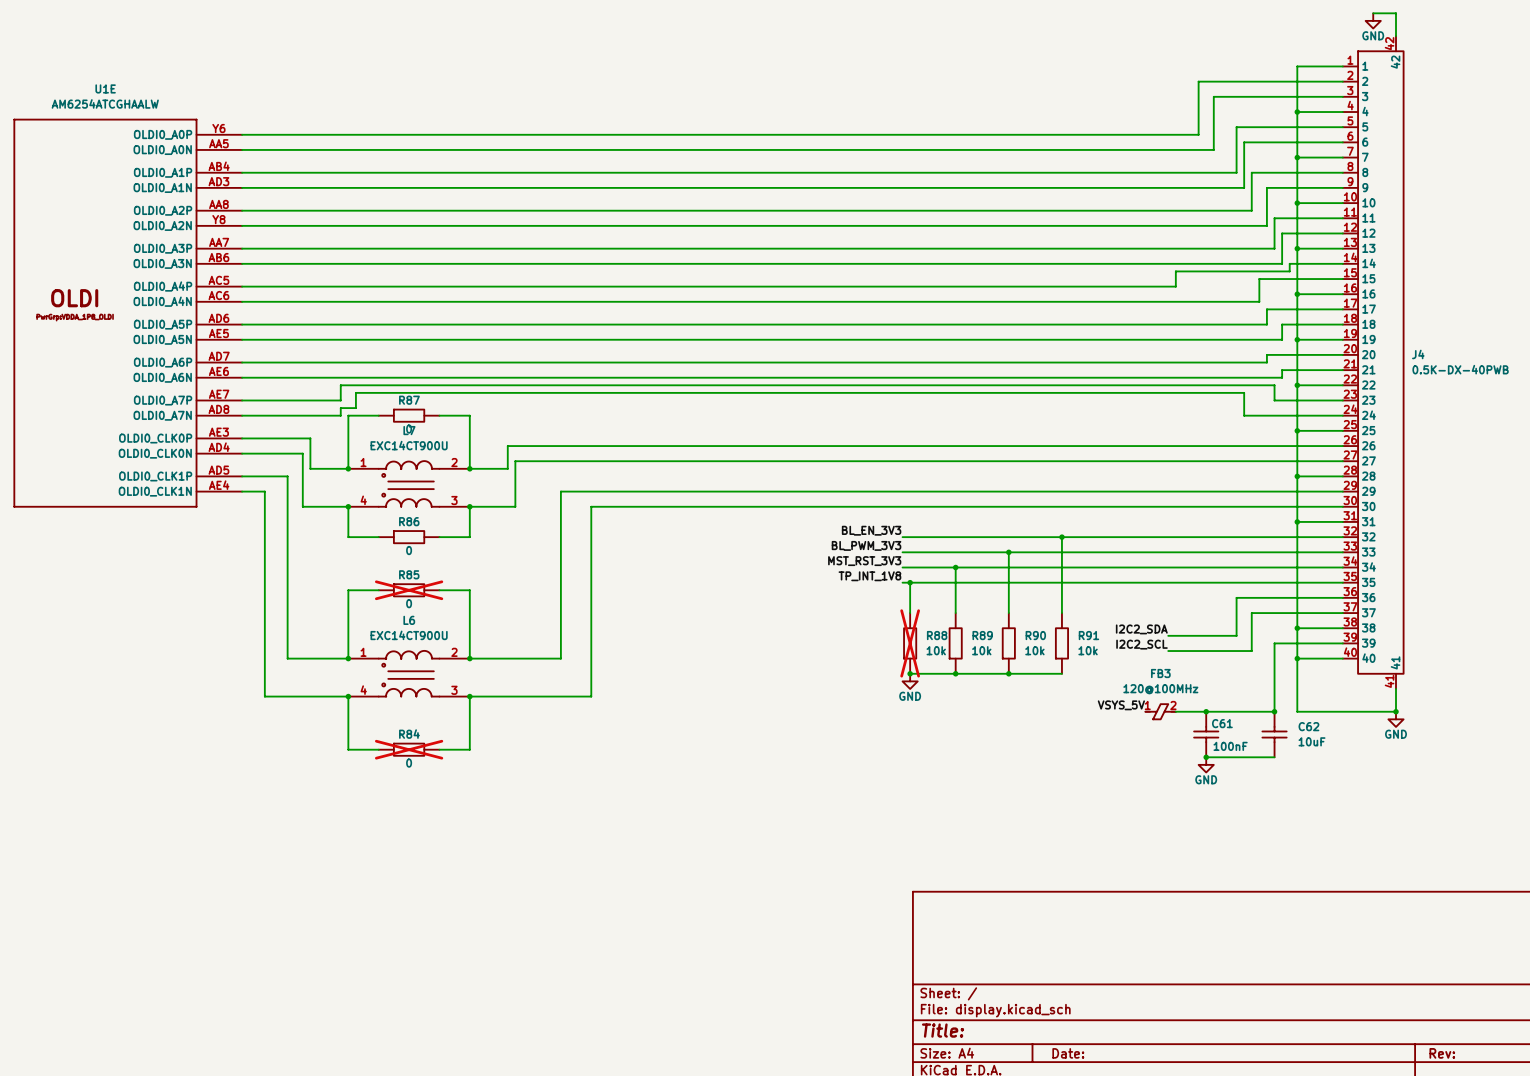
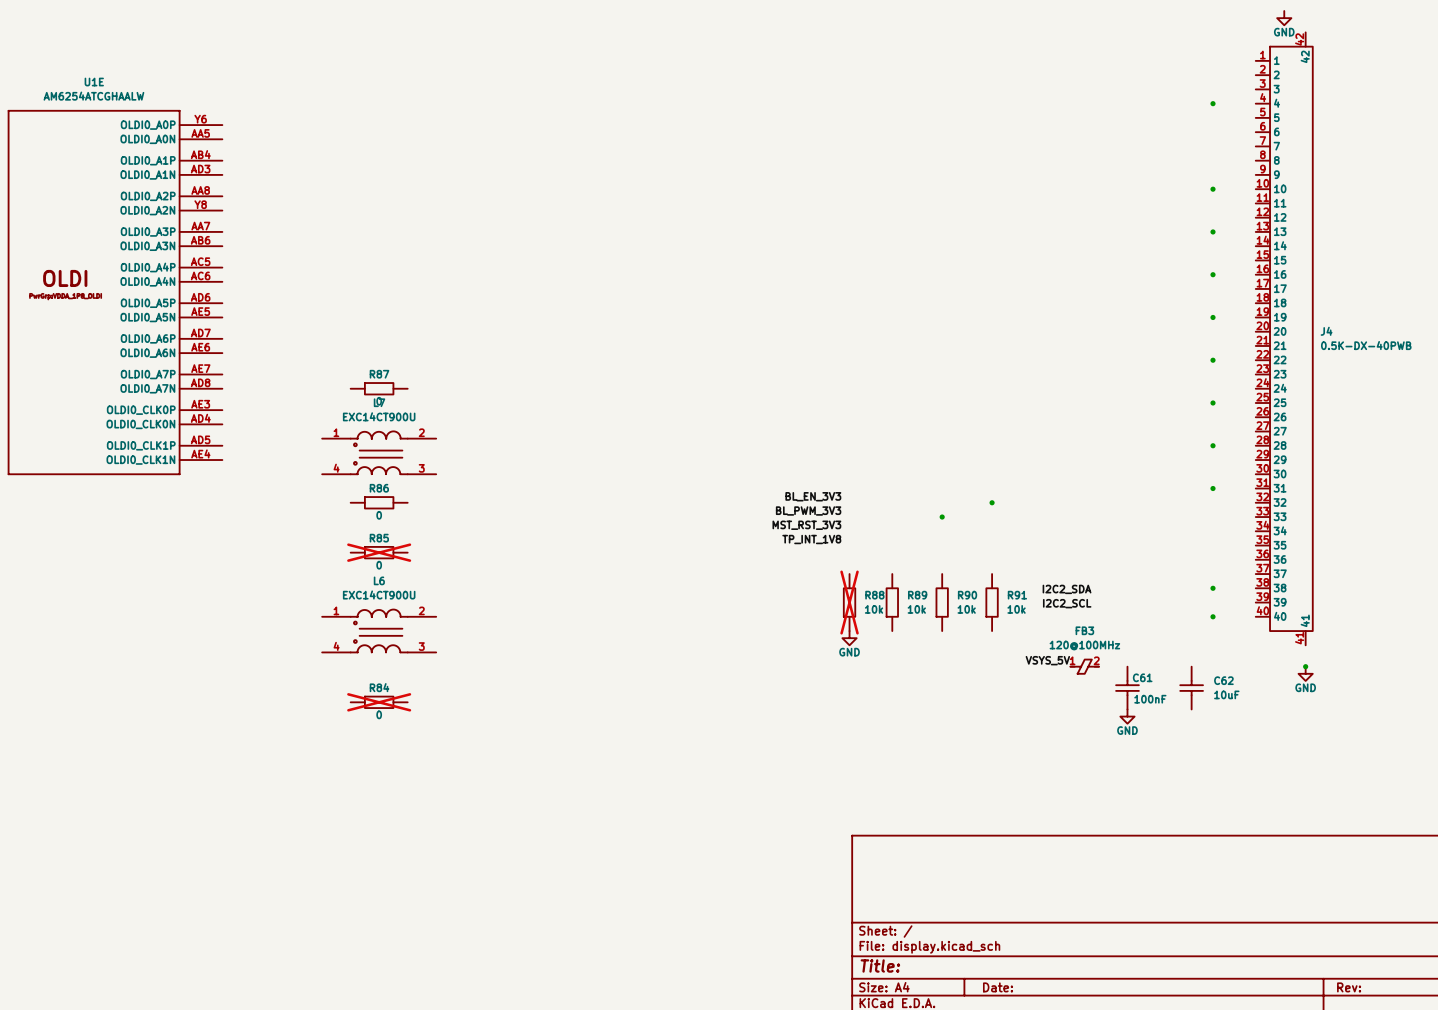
wire: (1373, 13) (1396, 13) (1396, 36) -> none
wire: (1342, 66) (1297, 66) (1297, 711) (1396, 711) (1396, 688) -> none
wire: (1342, 81) (1198, 81) (1198, 134) (242, 134) -> none
wire: (1342, 96) (1213, 96) (1213, 149) (242, 149) -> none
wire: (1297, 112) (1342, 112) -> none
wire: (1342, 127) (1236, 127) (1236, 172) (242, 172) -> none
wire: (1342, 142) (1244, 142) (1244, 187) (242, 187) -> none
wire: (1297, 157) (1342, 157) -> none
junction: (1297, 157) -> none
wire: (1342, 172) (1251, 172) (1251, 210) (242, 210) -> none
wire: (1342, 187) (1266, 187) (1266, 225) (242, 225) -> none
wire: (1297, 203) (1342, 203) -> none
wire: (1342, 218) (1274, 218) (1274, 248) (242, 248) -> none
wire: (1342, 233) (1282, 233) (1282, 263) (242, 263) -> none
wire: (1297, 248) (1342, 248) -> none
wire: (1342, 263) (1289, 263) (1289, 271) (1175, 271) (1175, 286) (242, 286) -> none
wire: (1342, 279) (1259, 279) (1259, 301) (242, 301) -> none
wire: (1297, 294) (1342, 294) -> none
wire: (1342, 309) (1266, 309) (1266, 324) (242, 324) -> none
wire: (1342, 324) (1282, 324) (1282, 339) (242, 339) -> none
wire: (1297, 339) (1342, 339) -> none
wire: (1342, 354) (1266, 354) (1266, 362) (242, 362) -> none
wire: (1342, 370) (1282, 370) (1282, 377) (242, 377) -> none
wire: (1297, 385) (1342, 385) -> none
wire: (242, 400) (340, 400) (340, 385) (1274, 385) (1274, 400) (1342, 400) -> none
wire: (242, 415) (340, 415) (340, 408) (355, 408) (355, 392) (1244, 392) (1244, 415) (1342, 415) -> none
wire: (378, 415) (348, 415) (348, 468) (310, 468) (310, 438) (242, 438) -> none
wire: (439, 415) (469, 415) (469, 468) (507, 468) (507, 446) (1342, 446) -> none
wire: (1297, 430) (1342, 430) -> none
wire: (242, 453) (302, 453) (302, 506) (348, 506) (348, 537) (378, 537) -> none
wire: (1342, 461) (515, 461) (515, 506) (469, 506) (469, 537) (439, 537) -> none
junction: (348, 468) -> none
junction: (469, 468) -> none
wire: (242, 476) (287, 476) (287, 658) (348, 658) (348, 590) (378, 590) -> none
wire: (1297, 476) (1342, 476) -> none
wire: (242, 491) (264, 491) (264, 696) (348, 696) (348, 749) (378, 749) -> none
wire: (1342, 491) (560, 491) (560, 658) (469, 658) (469, 590) (439, 590) -> none
junction: (348, 506) -> none
junction: (469, 506) -> none
wire: (1342, 506) (591, 506) (591, 696) (469, 696) (469, 749) (439, 749) -> none
wire: (1297, 521) (1342, 521) -> none
wire: (902, 537) (1342, 537) -> none
wire: (1061, 537) (1061, 613) -> none
wire: (902, 552) (1342, 552) -> none
wire: (1008, 552) (1008, 613) -> none
wire: (902, 567) (1342, 567) -> none
wire: (955, 567) (955, 613) -> none
junction: (955, 567) -> none
wire: (902, 582) (1342, 582) -> none
wire: (910, 582) (910, 613) -> none
junction: (910, 582) -> none
wire: (1342, 597) (1236, 597) (1236, 635) (1168, 635) -> none
wire: (1342, 613) (1251, 613) (1251, 651) (1168, 651) -> none
wire: (1297, 628) (1342, 628) -> none
wire: (1342, 643) (1274, 643) (1274, 711) (1175, 711) -> none
junction: (348, 658) -> none
junction: (469, 658) -> none
wire: (1297, 658) (1342, 658) -> none
wire: (910, 673) (1061, 673) -> none
junction: (910, 673) -> none
junction: (955, 673) -> none
junction: (1008, 673) -> none
junction: (348, 696) -> none
junction: (469, 696) -> none
junction: (1206, 711) -> none
junction: (1274, 711) -> none
wire: (1206, 757) (1274, 757) -> none
junction: (1206, 757) -> none

